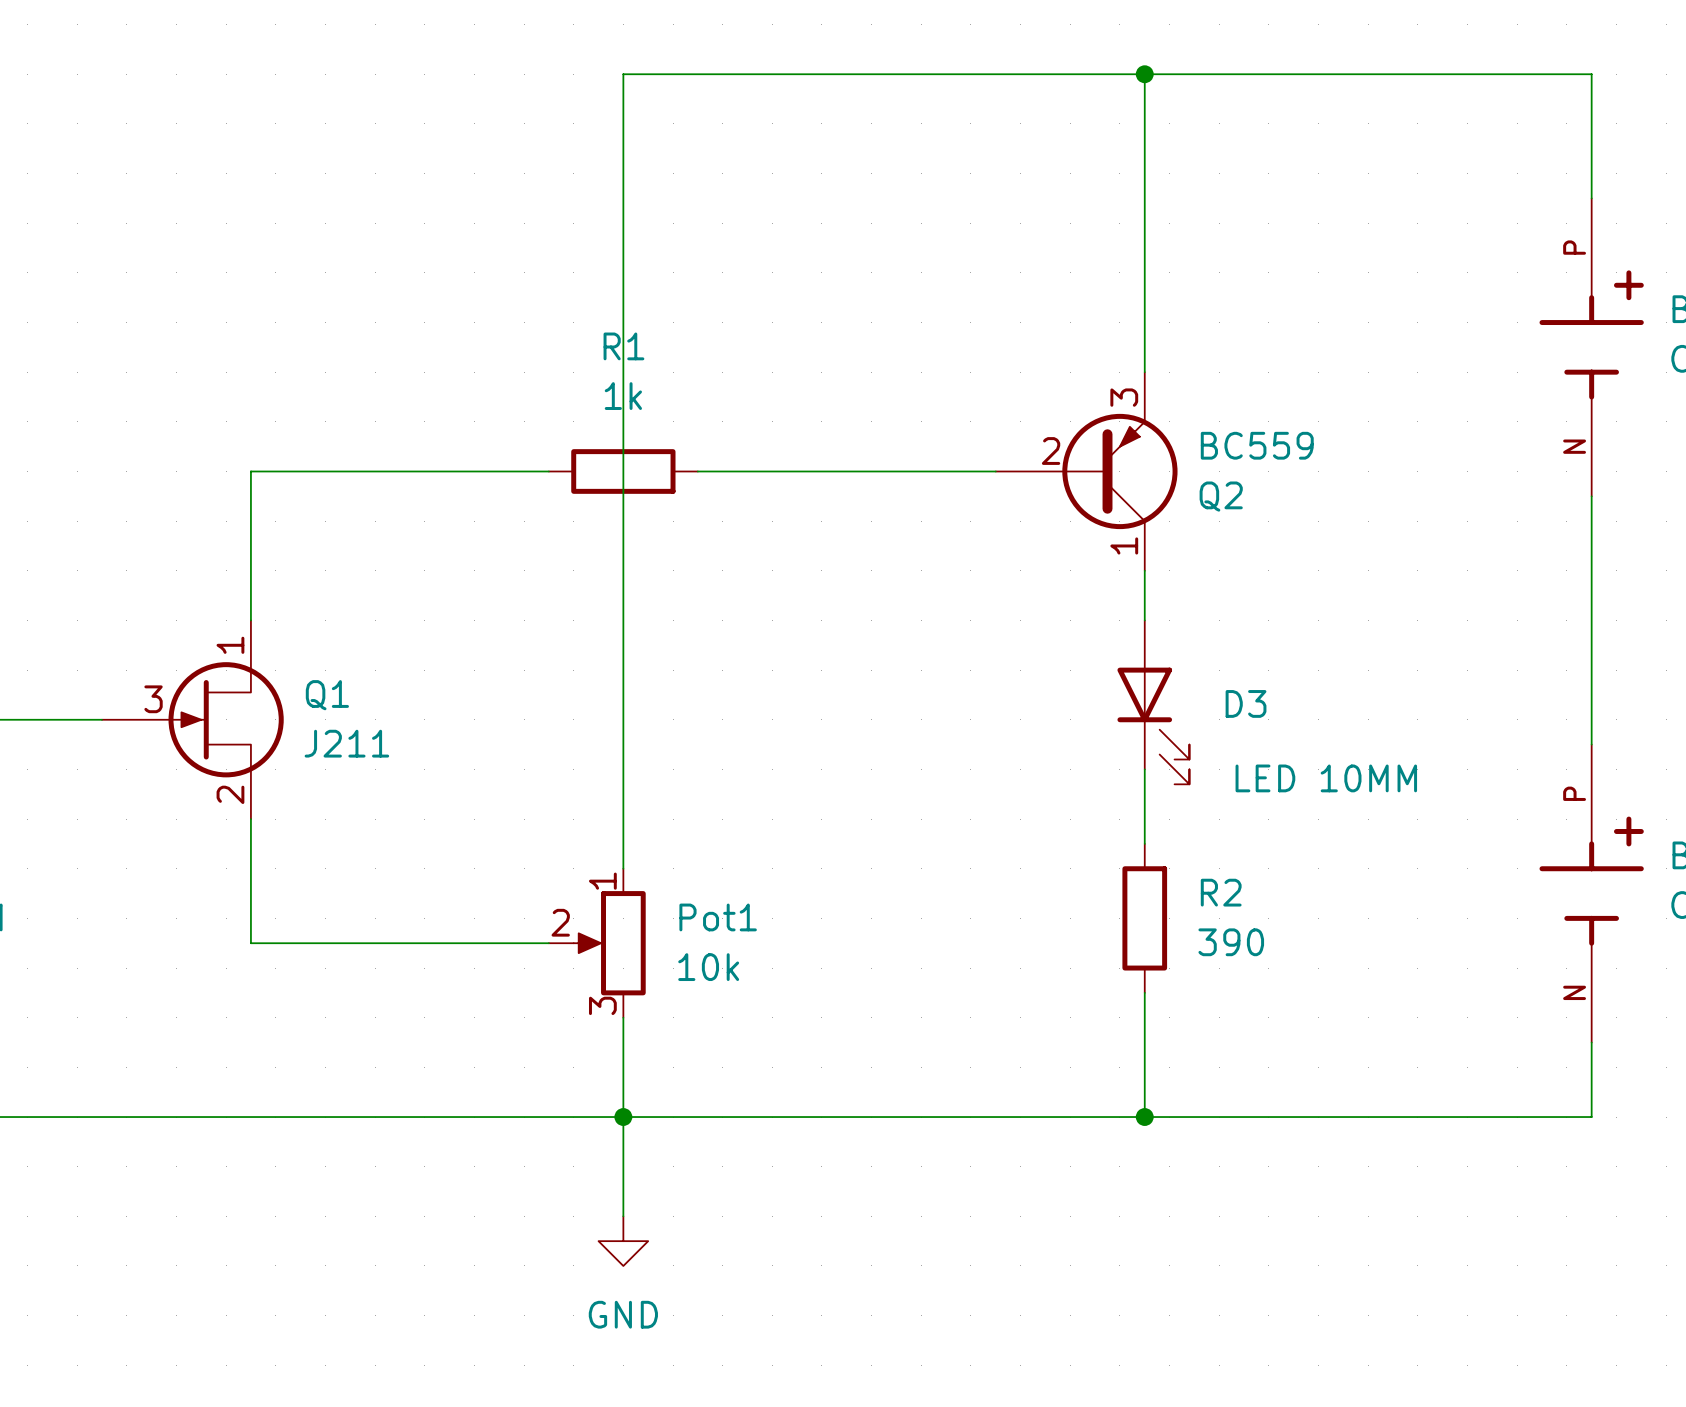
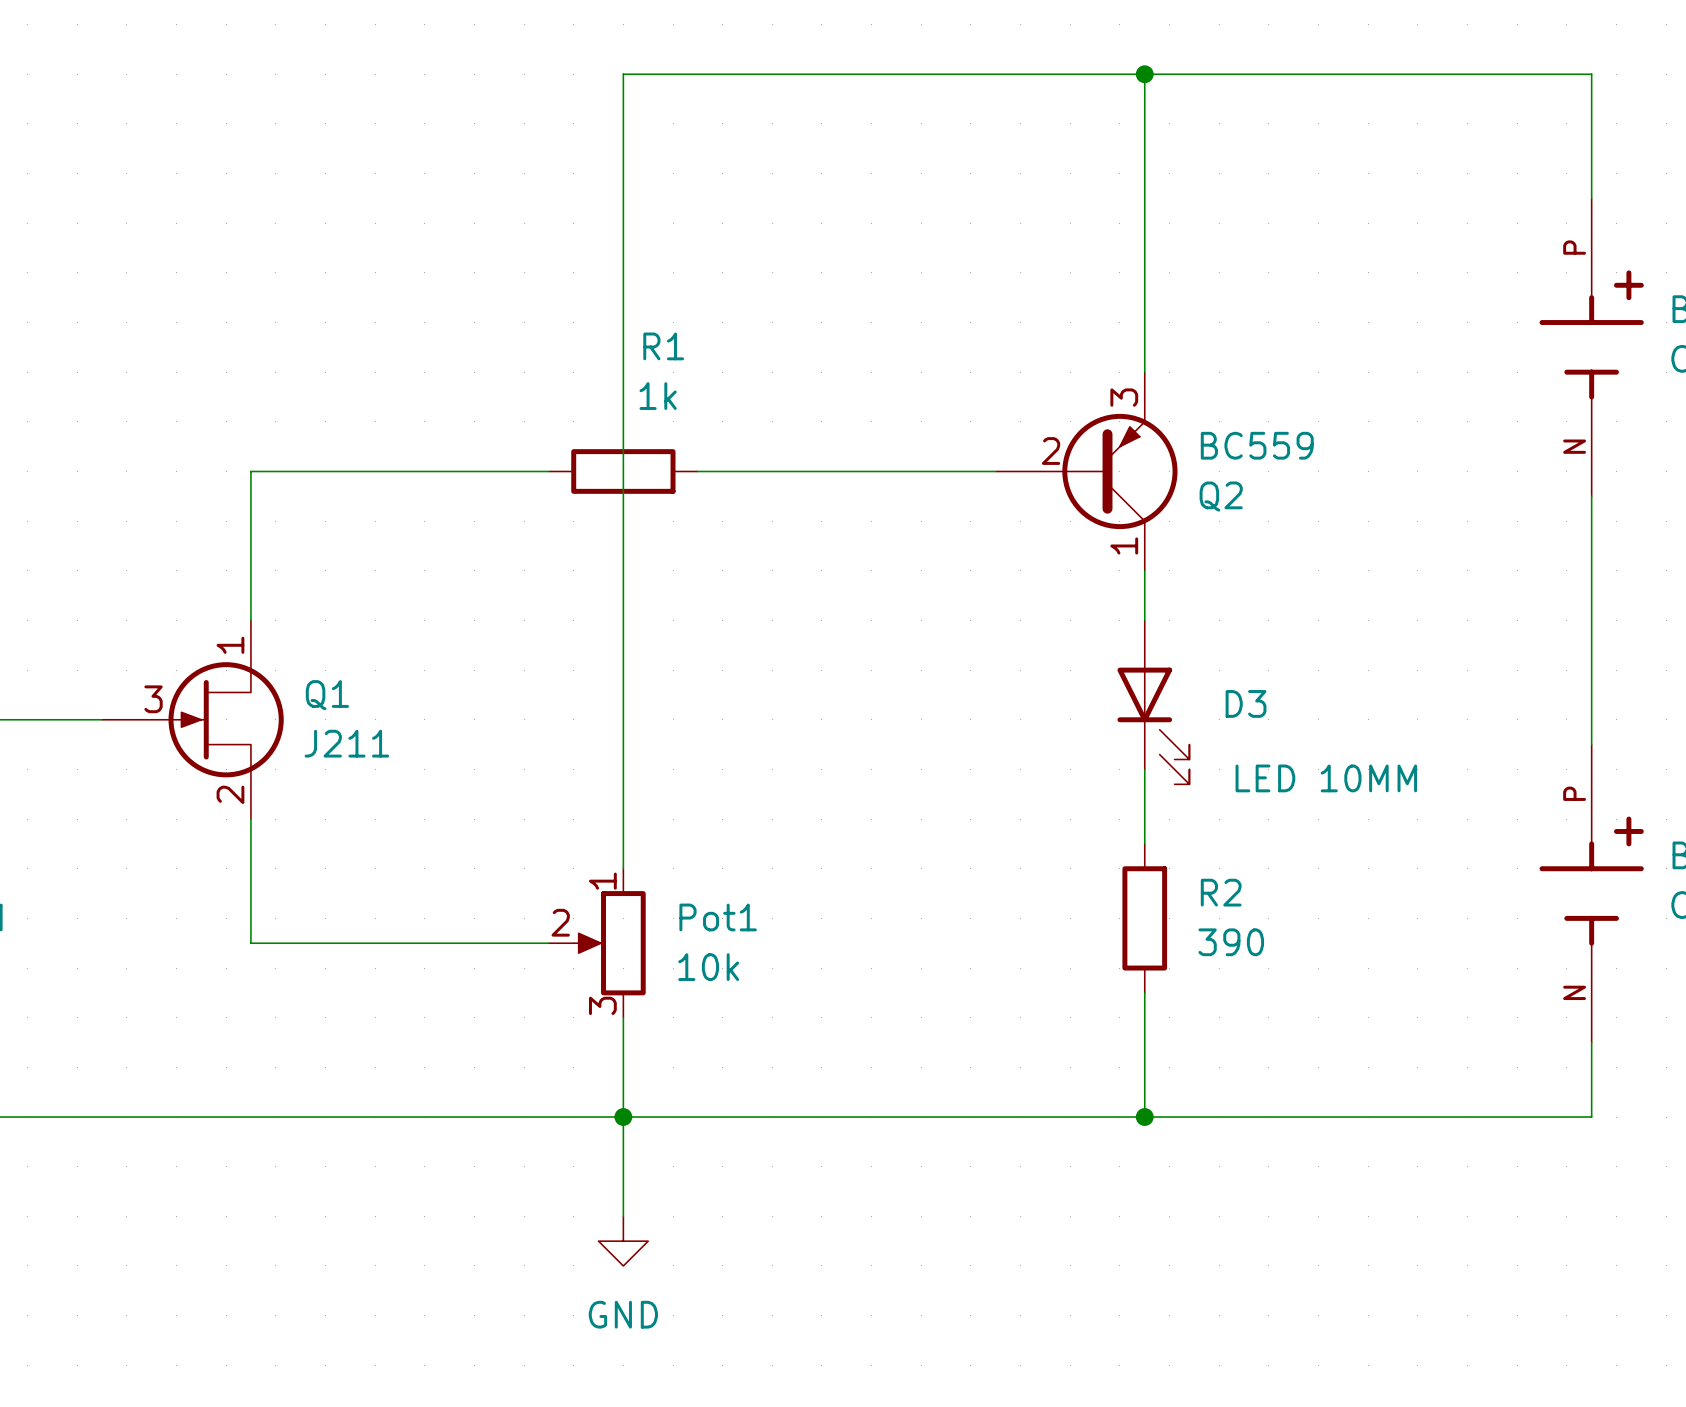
R1 name position: R1 (623, 346) -> R1 (663, 346)
R1 value position: 1k (623, 396) -> 1k (658, 396)

